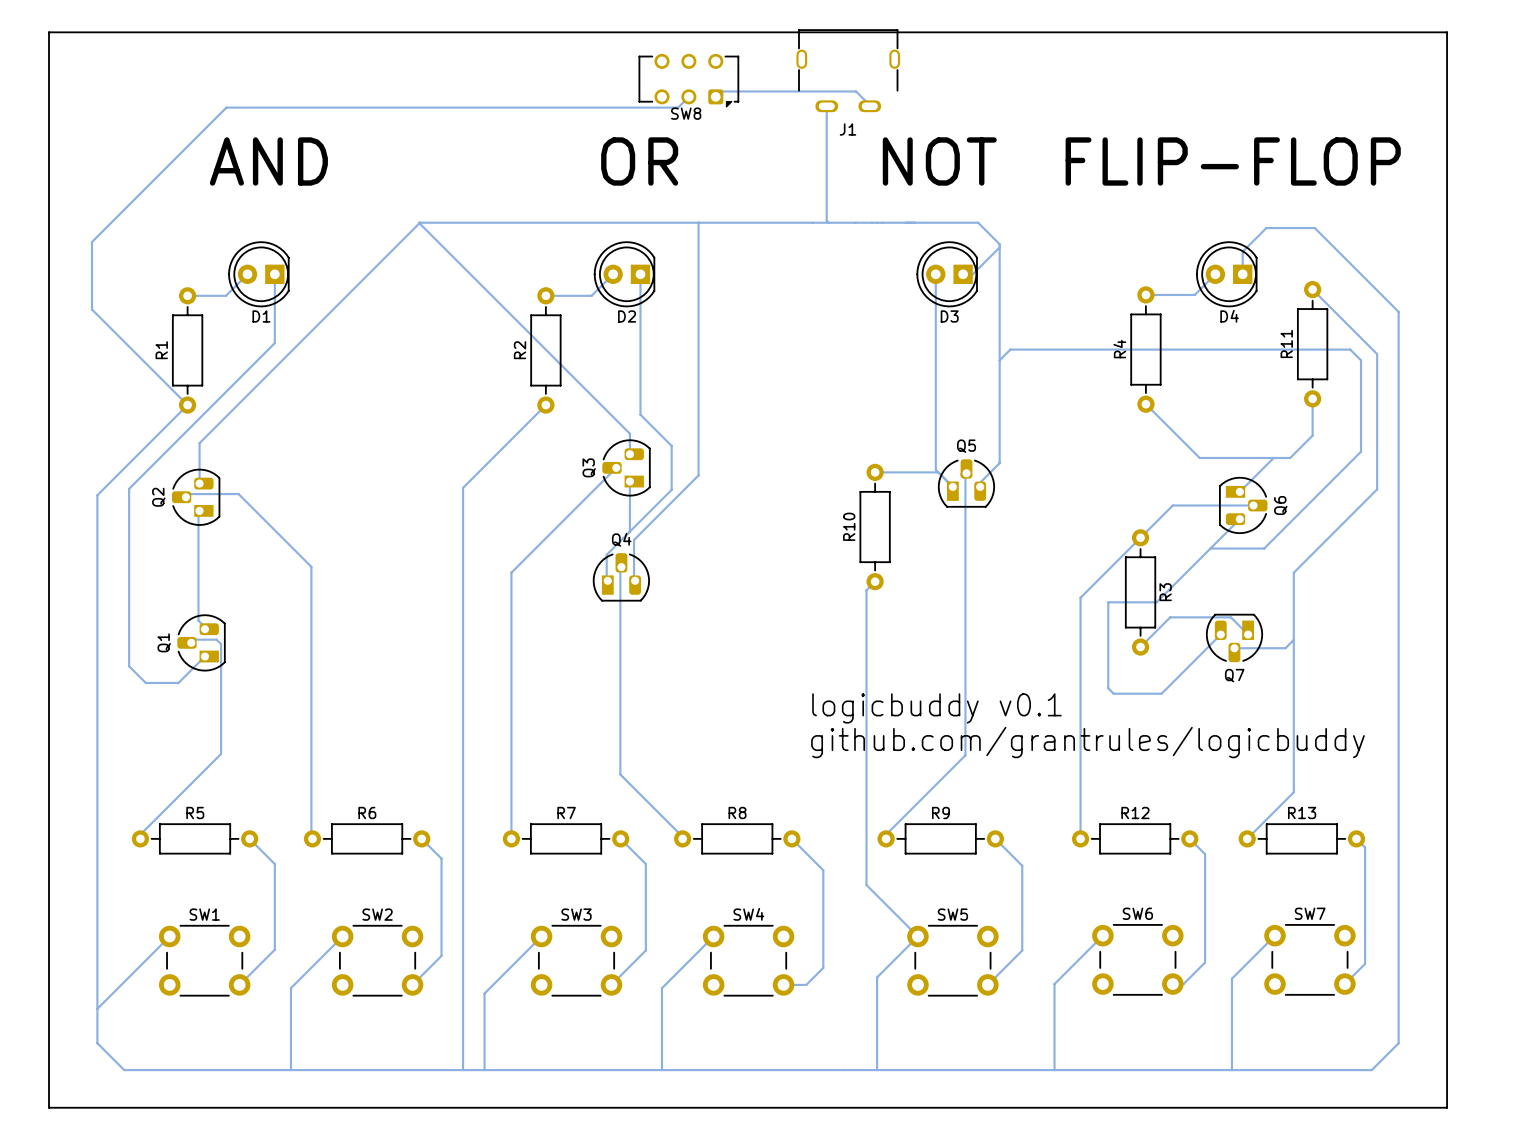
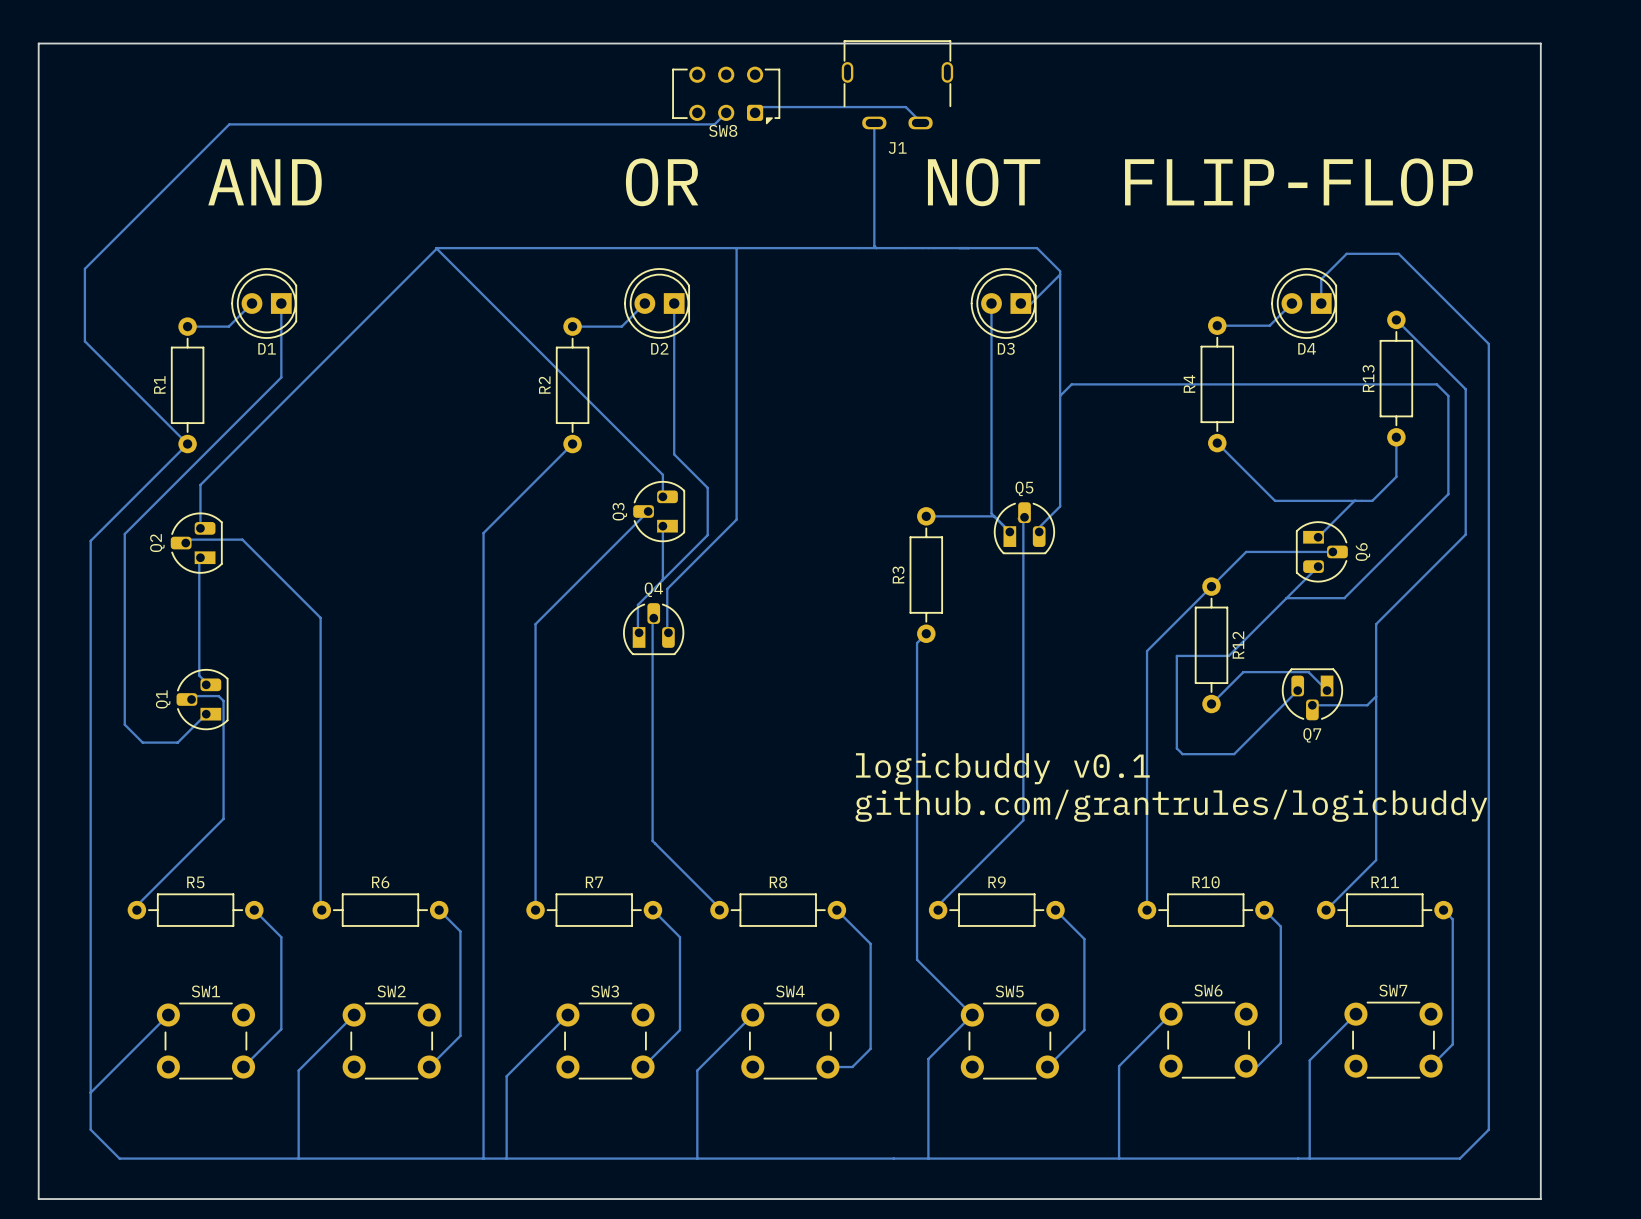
R11 name: R11 (1286, 343) -> R13 (1368, 378)
R10 name: R10 (849, 526) -> R3 (898, 574)
R3 name: R3 (1165, 592) -> R12 (1238, 645)
R12 name: R12 (1135, 813) -> R10 (1206, 882)
R13 name: R13 (1302, 813) -> R11 (1385, 882)

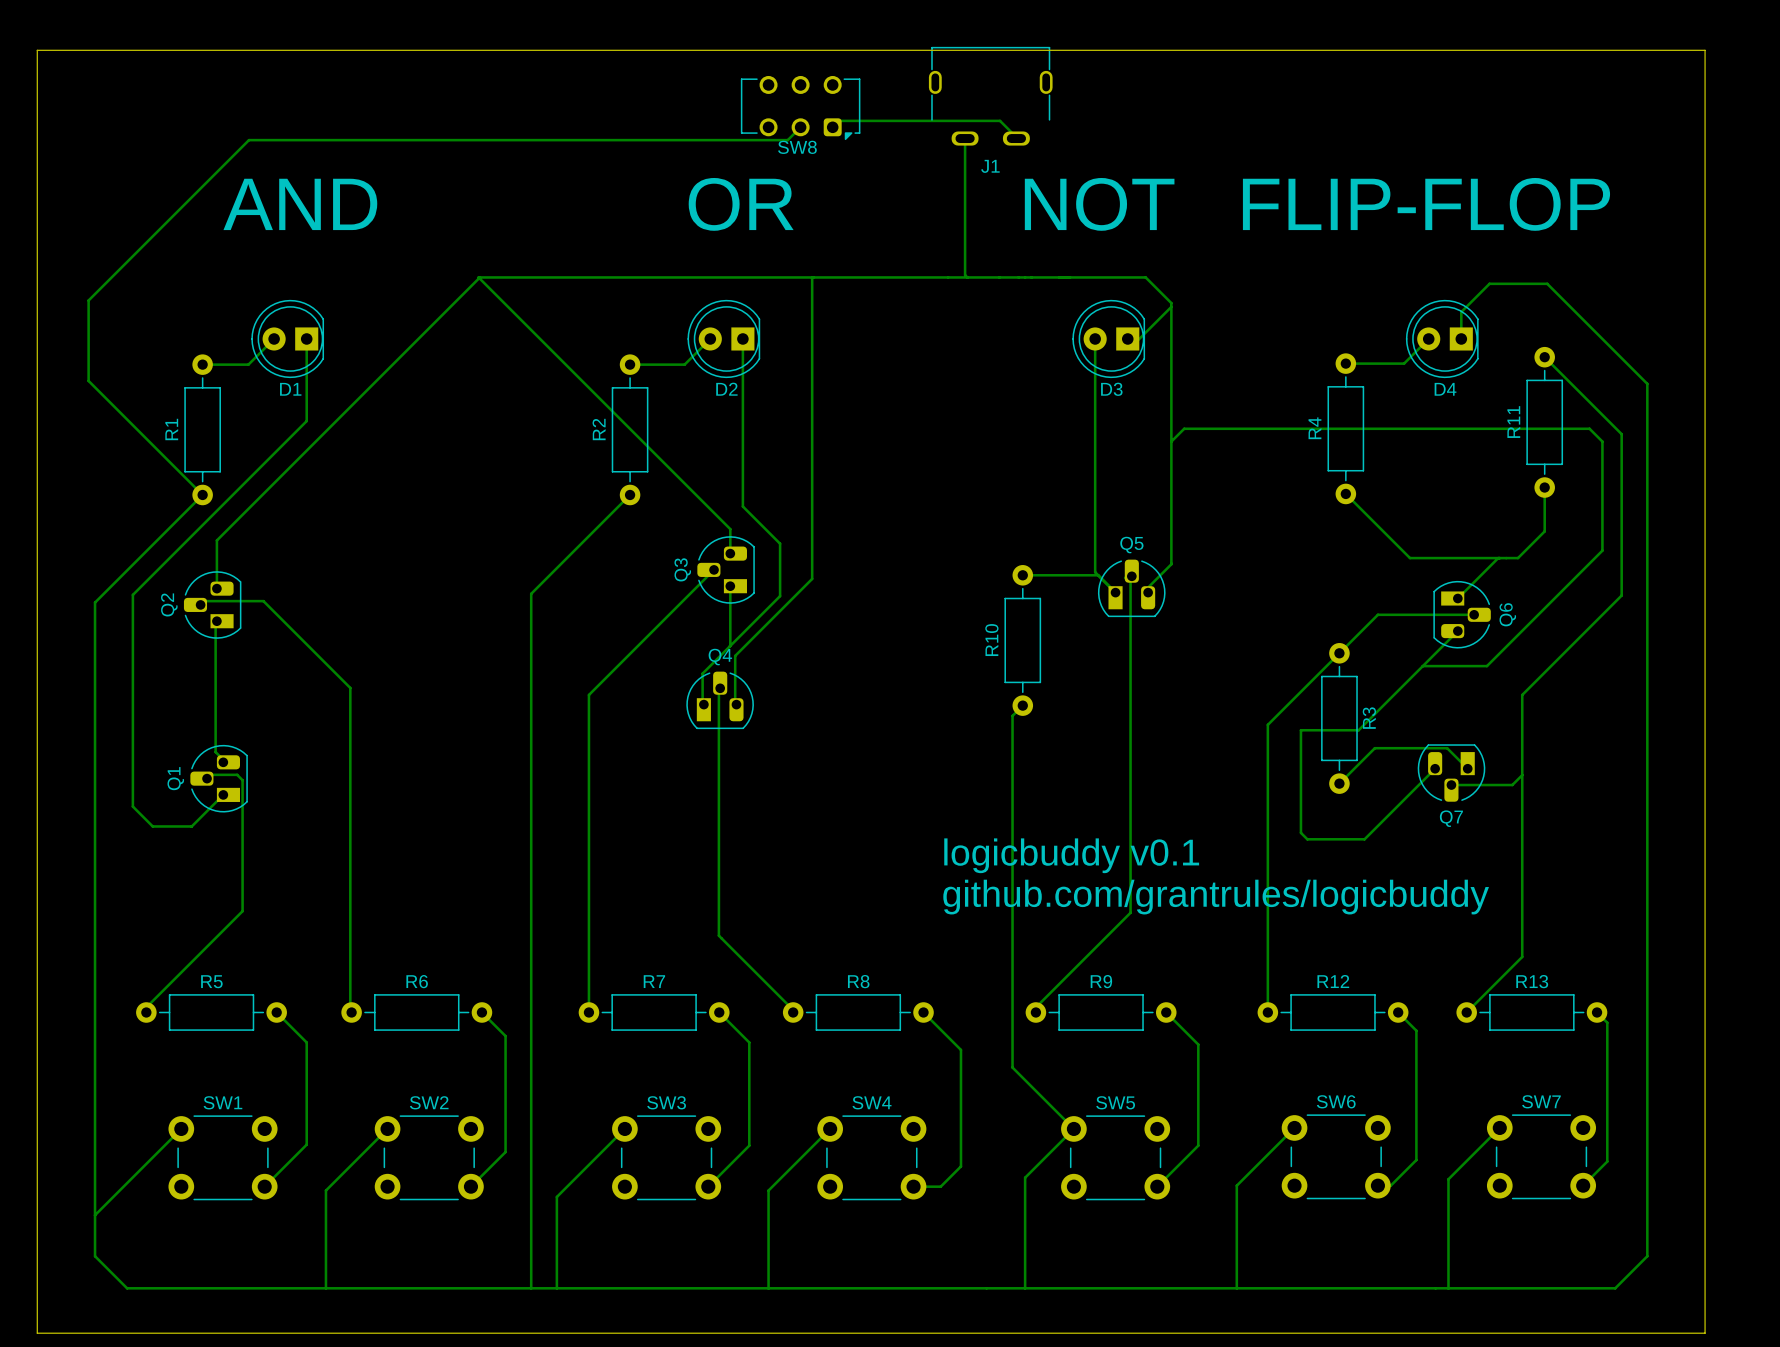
R13 name: R13 (1368, 378) -> R11 (1513, 422)
R3 name: R3 (898, 574) -> R10 (991, 640)
R12 name: R12 (1238, 645) -> R3 (1369, 718)
R10 name: R10 (1206, 882) -> R12 (1333, 981)
R11 name: R11 (1385, 882) -> R13 (1532, 981)

